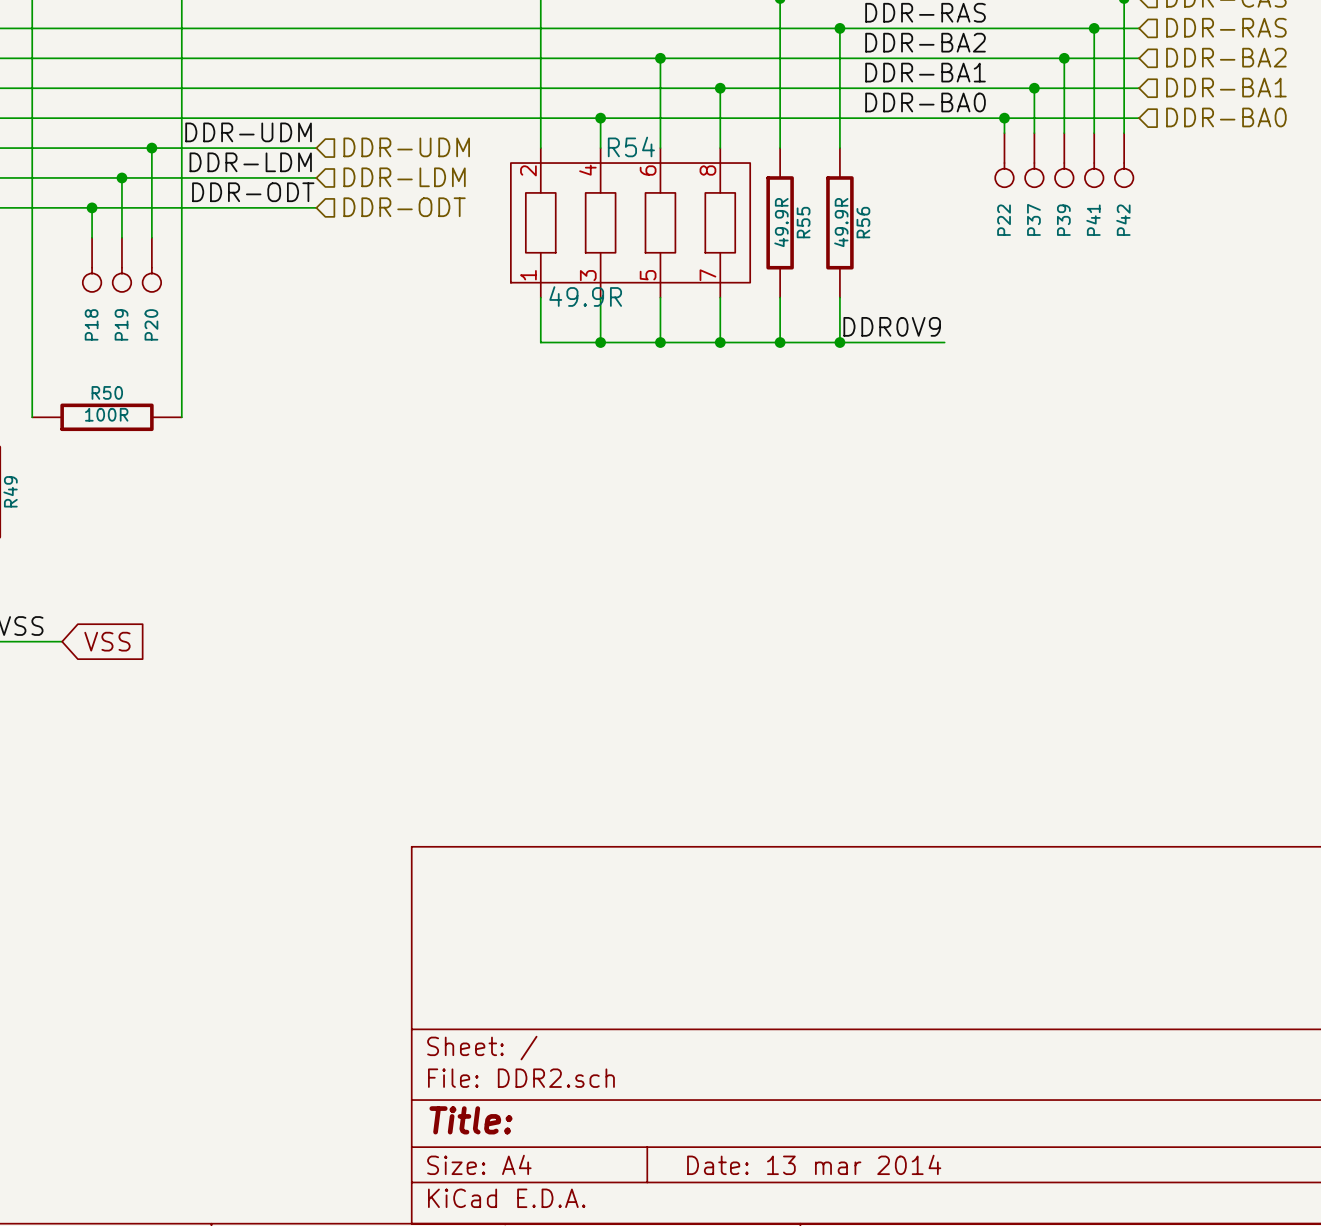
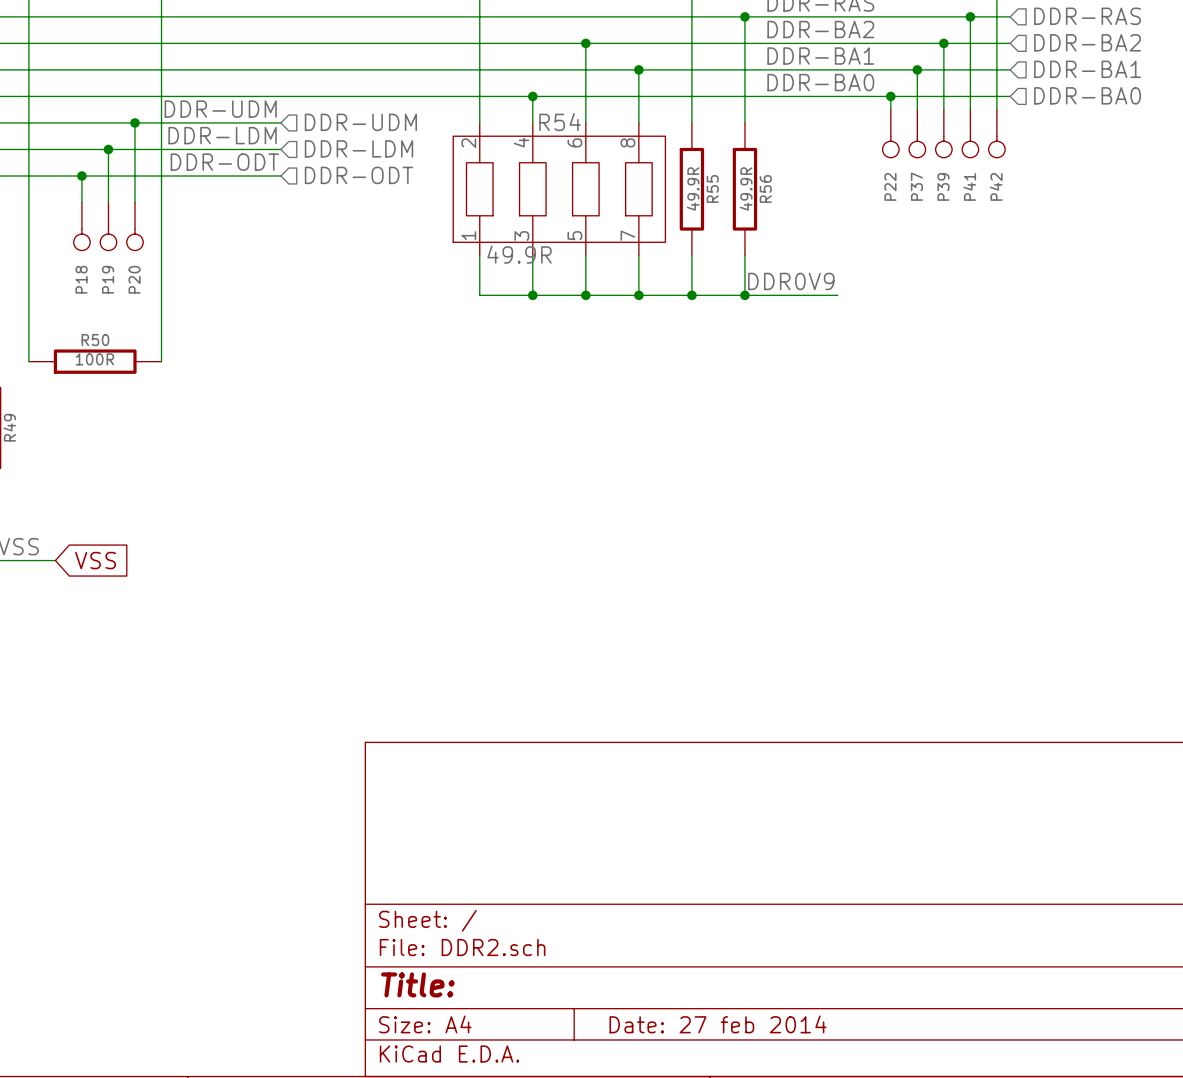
title block: Date: 13 mar 2014 (814, 1164) -> Date: 27 feb 2014 (718, 1024)

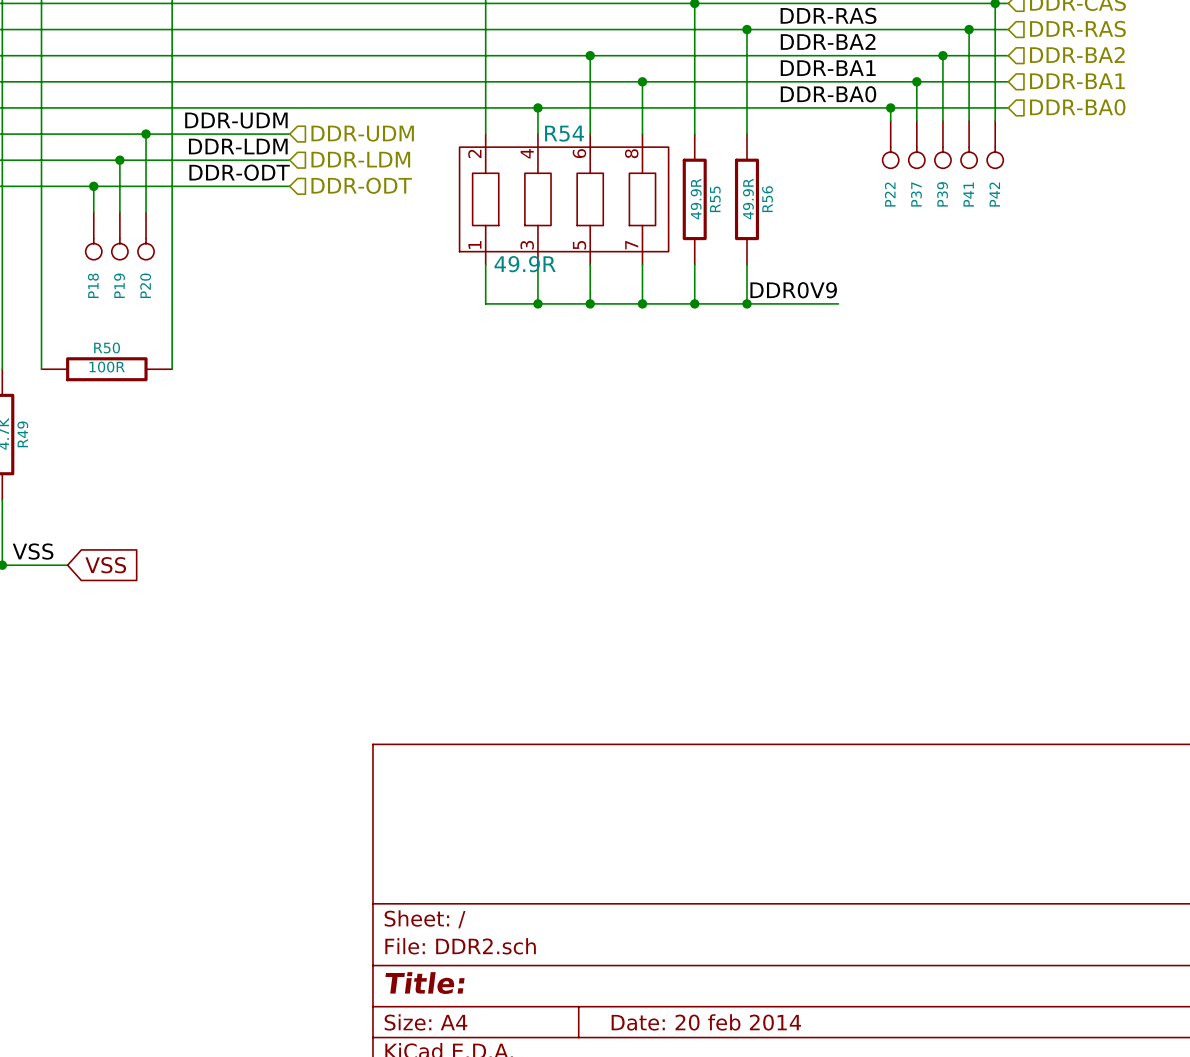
title block: Date: 27 feb 2014 (718, 1024) -> Date: 20 feb 2014 (706, 1022)

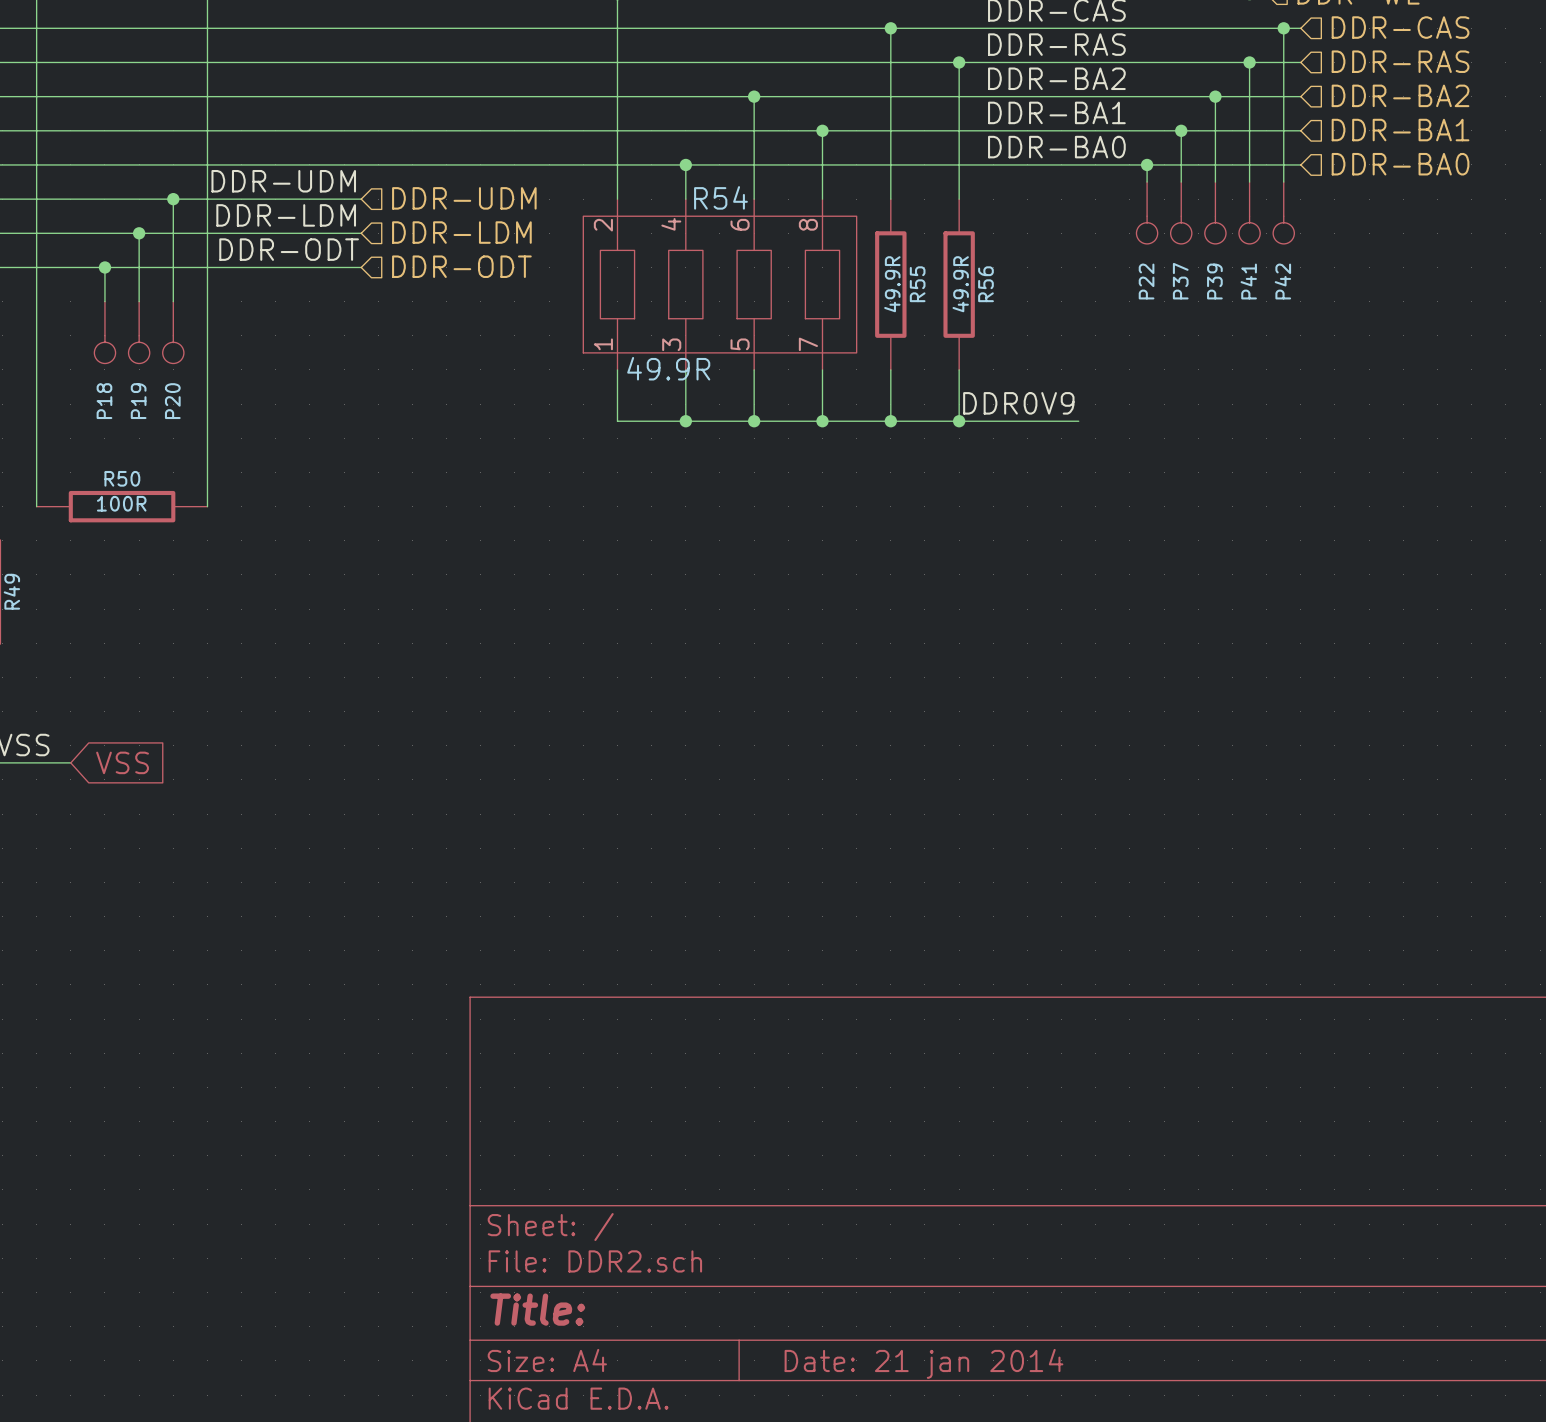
title block: Date: 20 feb 2014 (706, 1022) -> Date: 21 jan 2014 (923, 1363)

